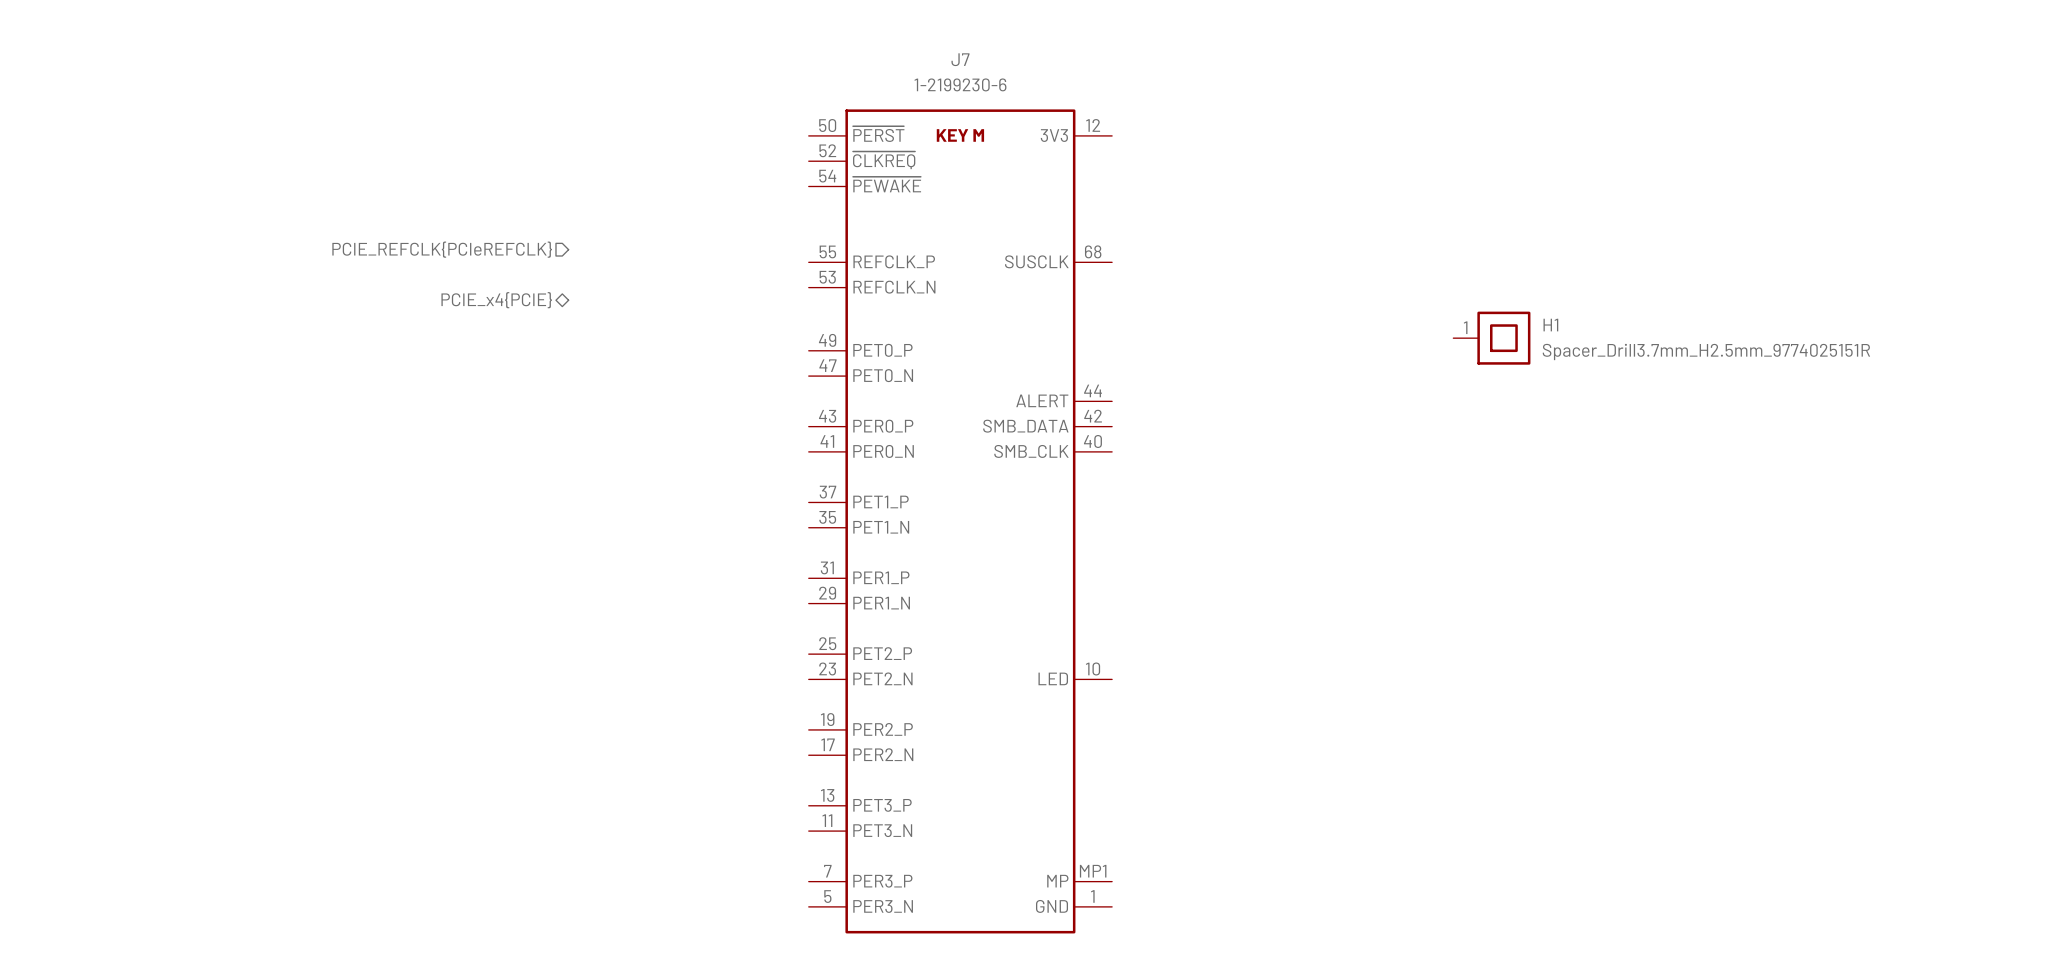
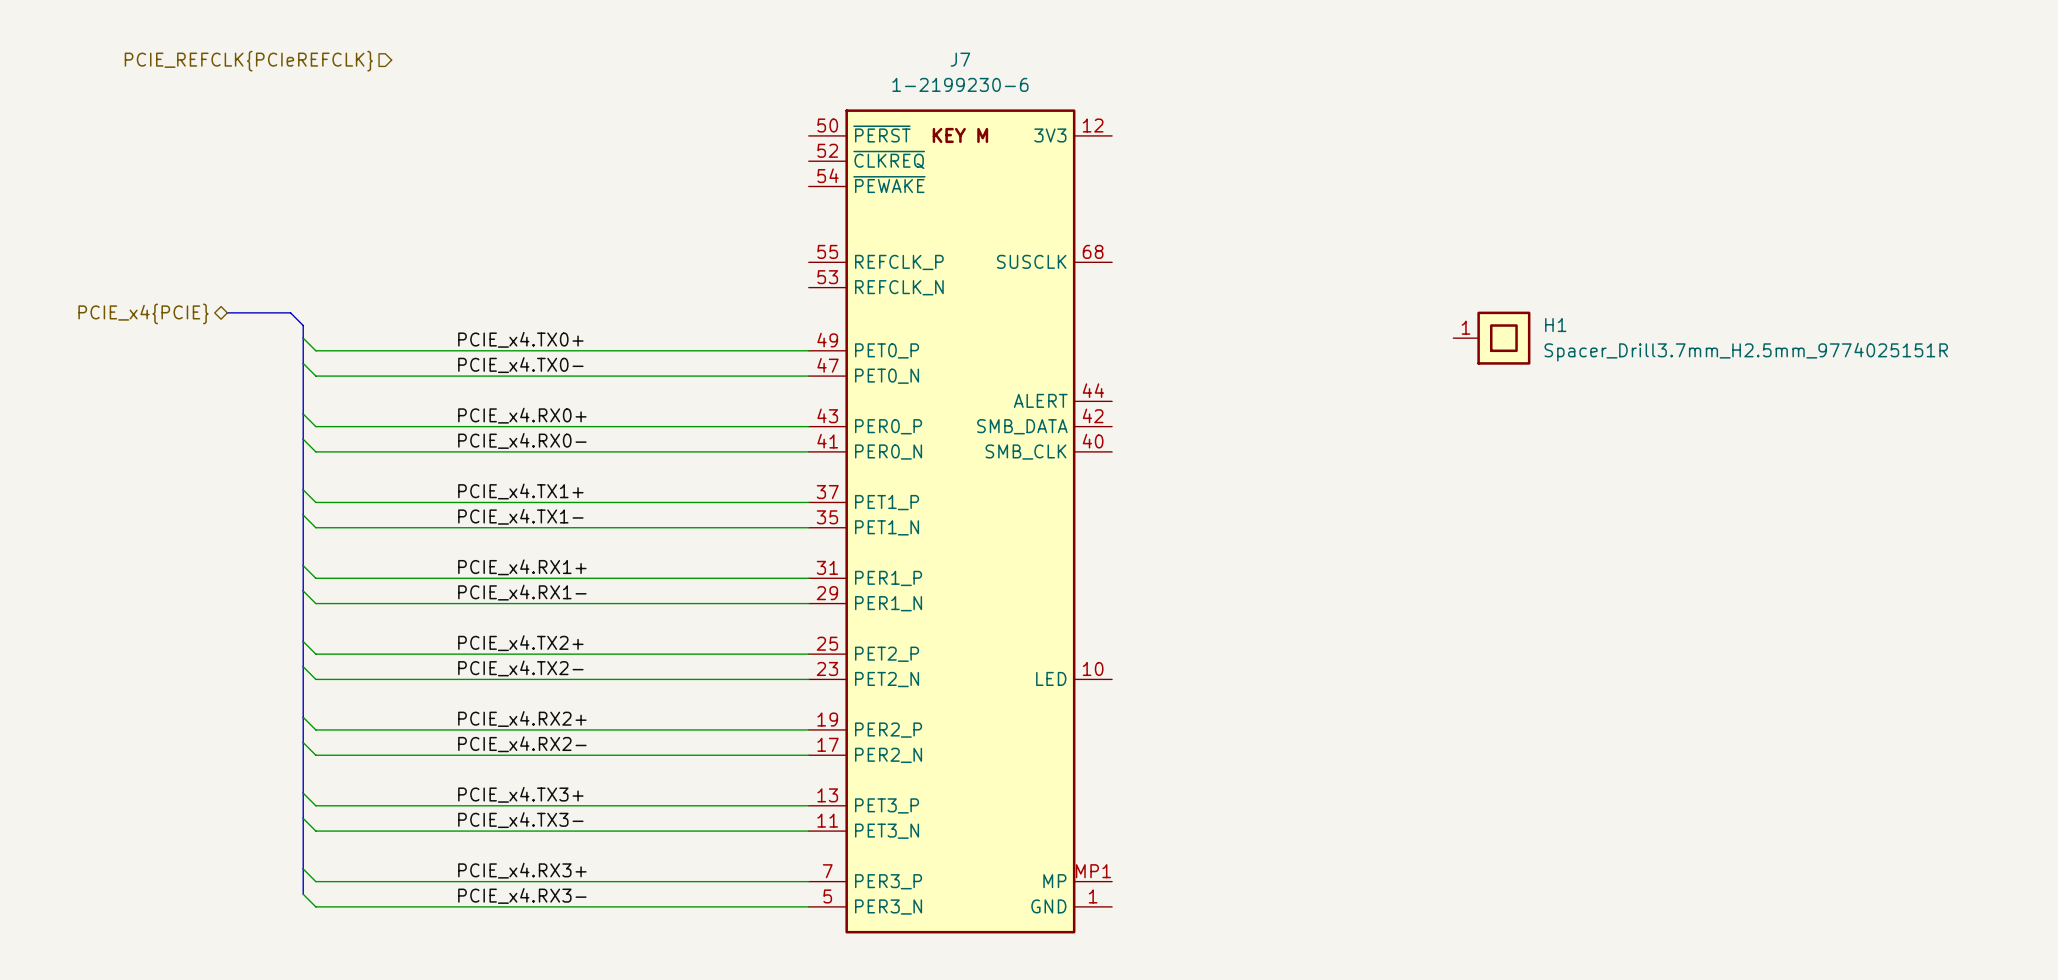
hierarchical label: none -> PCIE_REFCLK{PCIeREFCLK} (248, 61)
hierarchical label: PCIE_REFCLK{PCIeREFCLK} (442, 249) -> none
hierarchical label: PCIE_x4{PCIE} (496, 300) -> none
hierarchical label: none -> PCIE_x4{PCIE} (143, 313)
bus: none -> (227, 312) (290, 312) (303, 325) (303, 894)
wire: none -> (303, 338) (315, 350) (808, 350)
label: none -> PCIE_x4.TX0+ (520, 339)
wire: none -> (303, 363) (315, 376) (808, 376)
label: none -> PCIE_x4.TX0- (520, 365)
wire: none -> (303, 413) (315, 426) (808, 426)
label: none -> PCIE_x4.RX0+ (522, 415)
wire: none -> (303, 439) (315, 451) (808, 451)
label: none -> PCIE_x4.RX0- (522, 440)
wire: none -> (303, 489) (315, 502) (808, 502)
label: none -> PCIE_x4.TX1+ (520, 491)
wire: none -> (303, 515) (315, 527) (808, 527)
label: none -> PCIE_x4.TX1- (520, 516)
wire: none -> (303, 565) (315, 578) (808, 578)
label: none -> PCIE_x4.RX1+ (522, 567)
wire: none -> (303, 590) (315, 603) (808, 603)
label: none -> PCIE_x4.RX1- (522, 592)
wire: none -> (303, 641) (315, 654) (808, 654)
label: none -> PCIE_x4.TX2+ (520, 643)
wire: none -> (303, 666) (315, 679) (808, 679)
label: none -> PCIE_x4.TX2- (520, 668)
wire: none -> (303, 717) (315, 729) (808, 729)
label: none -> PCIE_x4.RX2+ (522, 718)
wire: none -> (303, 742) (315, 755) (808, 755)
label: none -> PCIE_x4.RX2- (522, 744)
wire: none -> (303, 793) (315, 805) (808, 805)
label: none -> PCIE_x4.TX3+ (520, 794)
wire: none -> (303, 818) (315, 831) (808, 831)
label: none -> PCIE_x4.TX3- (520, 820)
wire: none -> (303, 868) (315, 881) (808, 881)
label: none -> PCIE_x4.RX3+ (522, 870)
wire: none -> (303, 894) (315, 906) (808, 906)
label: none -> PCIE_x4.RX3- (522, 895)

